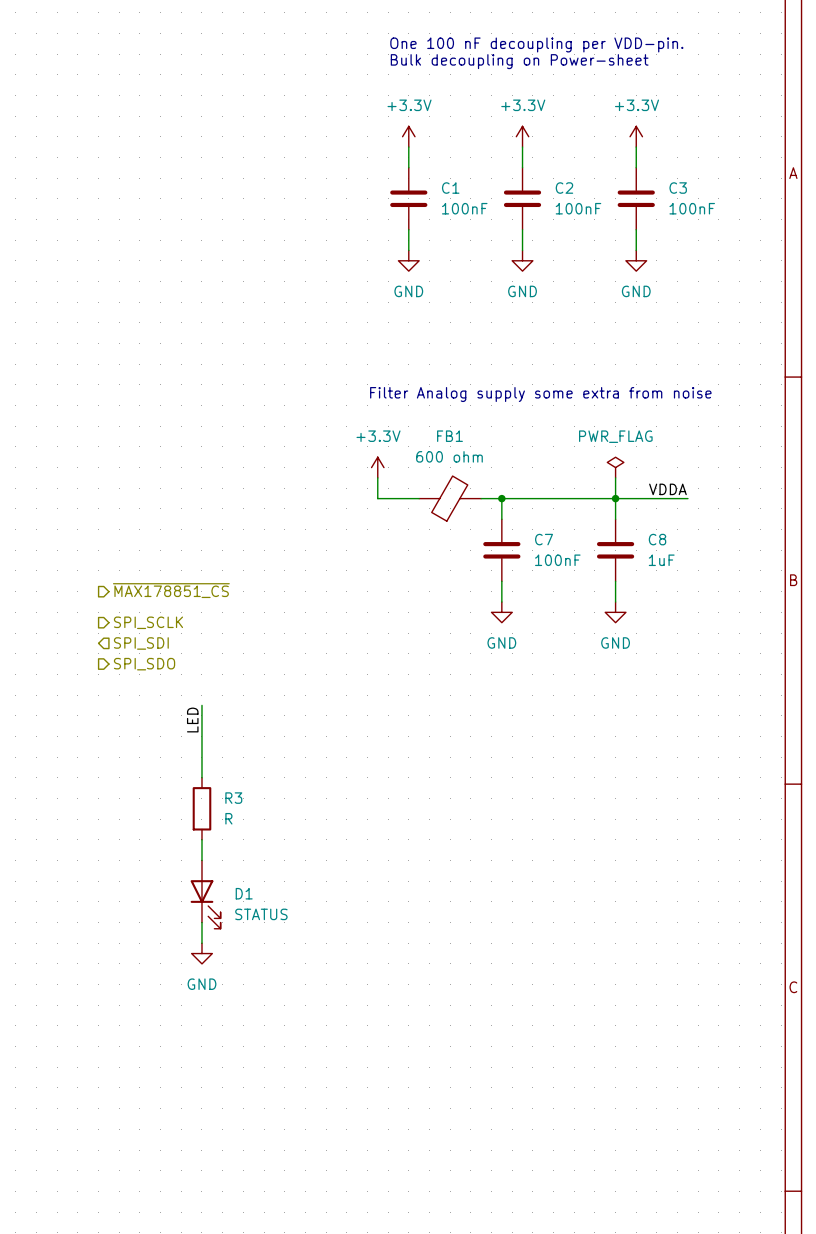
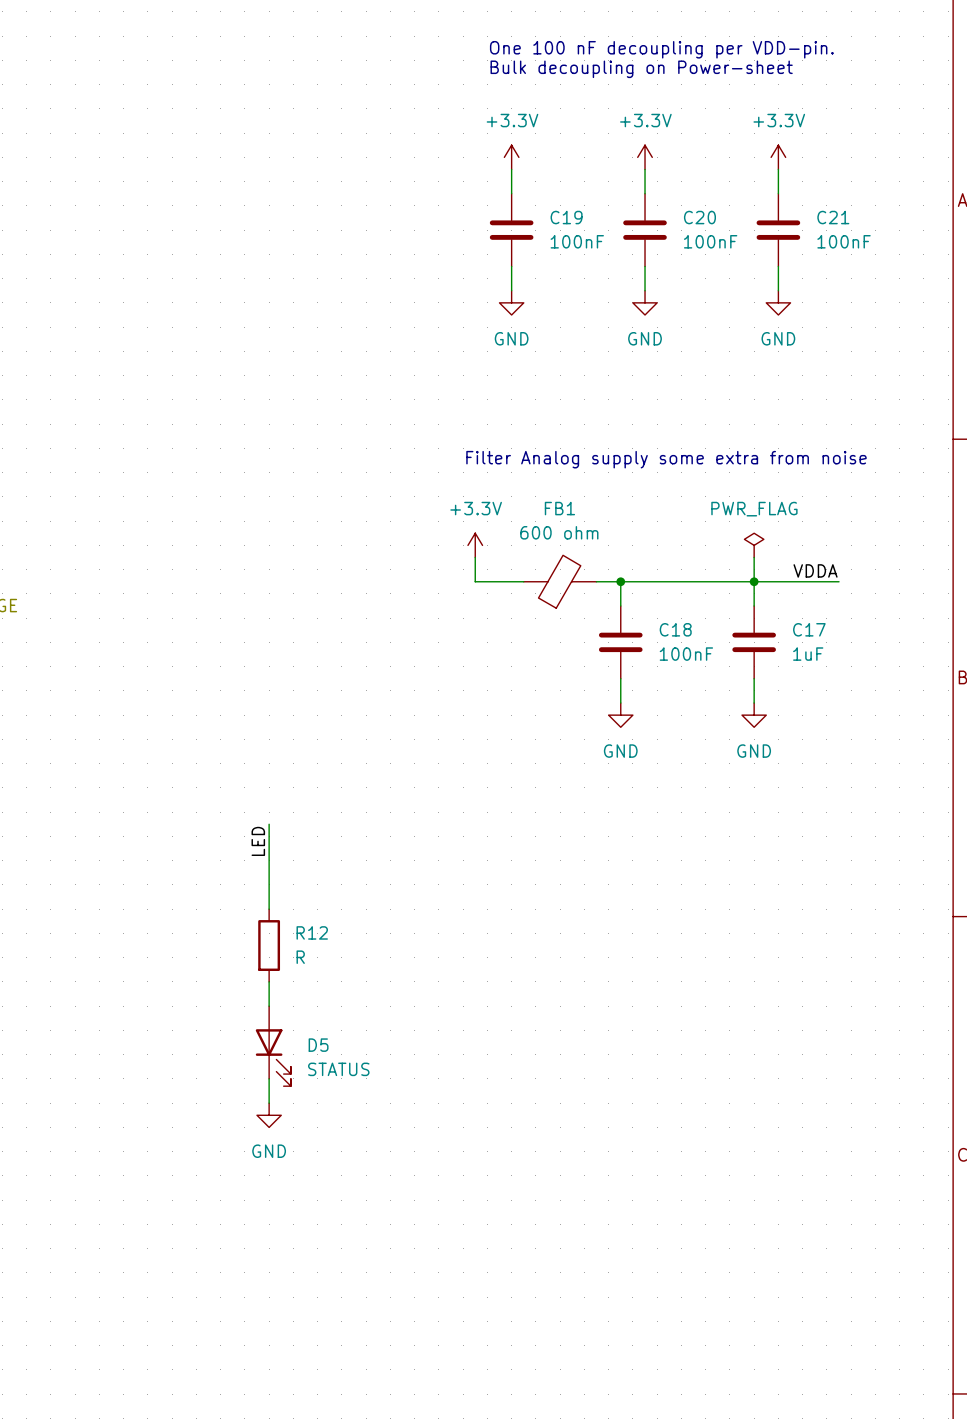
C1 name: C1 (450, 188) -> C19 (566, 217)
C2 name: C2 (564, 188) -> C20 (699, 217)
C3 name: C3 (678, 188) -> C21 (833, 217)
C7 name: C7 (544, 539) -> C18 (675, 629)
C8 name: C8 (657, 539) -> C17 (809, 629)
hierarchical label: ~{MAX178851_CS} (171, 590) -> none
hierarchical label: SPI_SCLK (148, 622) -> none
hierarchical label: SPI_SDI (141, 643) -> none
hierarchical label: SPI_SDO (144, 664) -> none
R3 name: R3 (233, 798) -> R12 (312, 932)
D1 name: D1 (244, 893) -> D5 (318, 1045)

